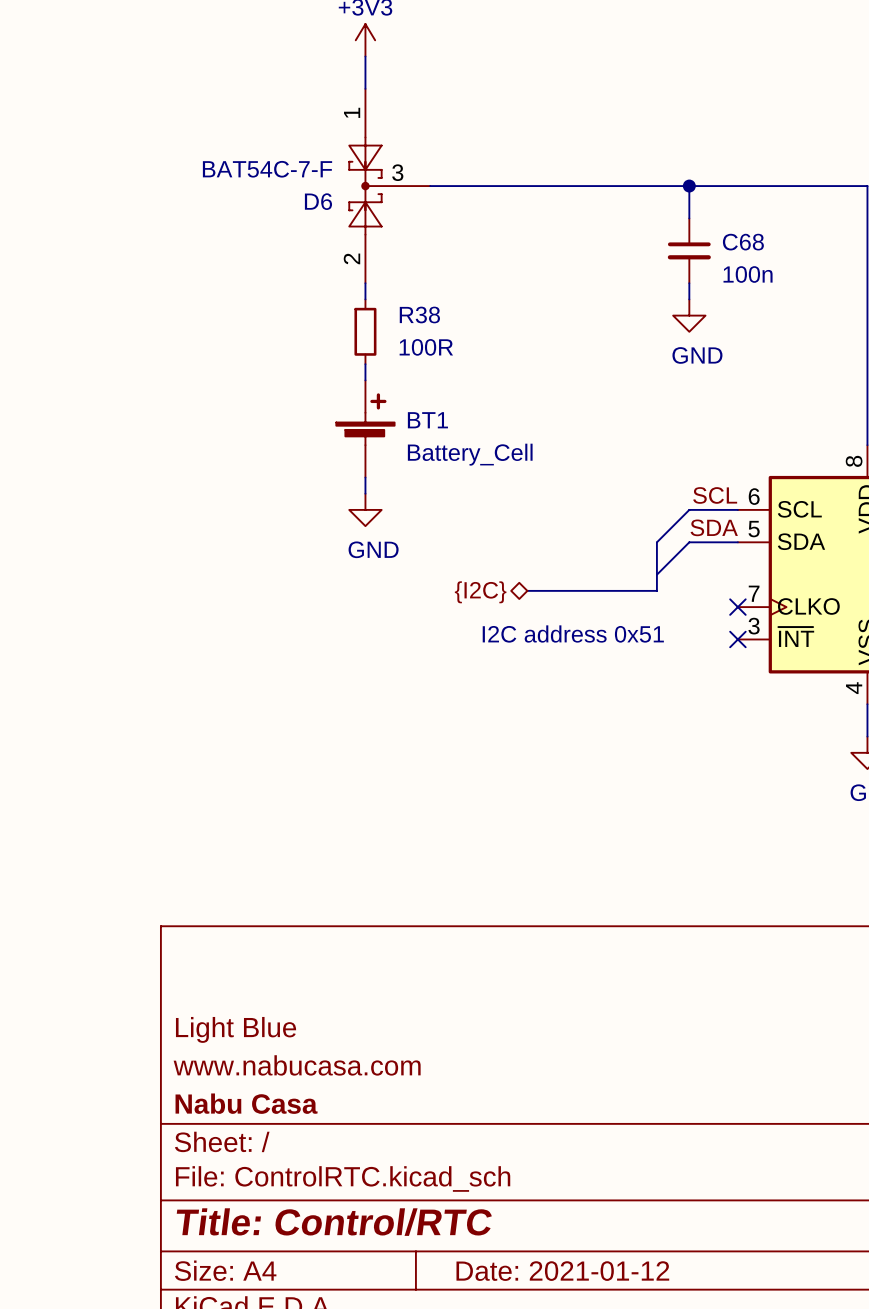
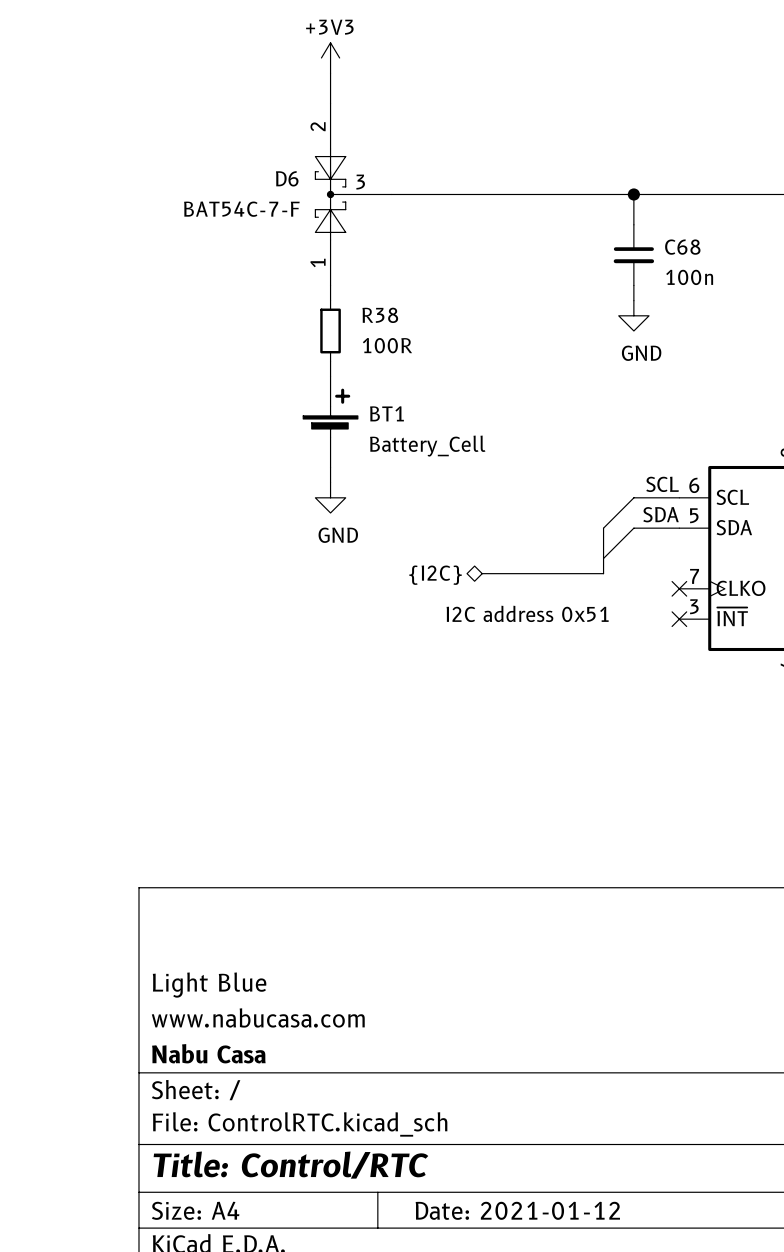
D6 flip: as is (365, 186) -> up-down (330, 194)

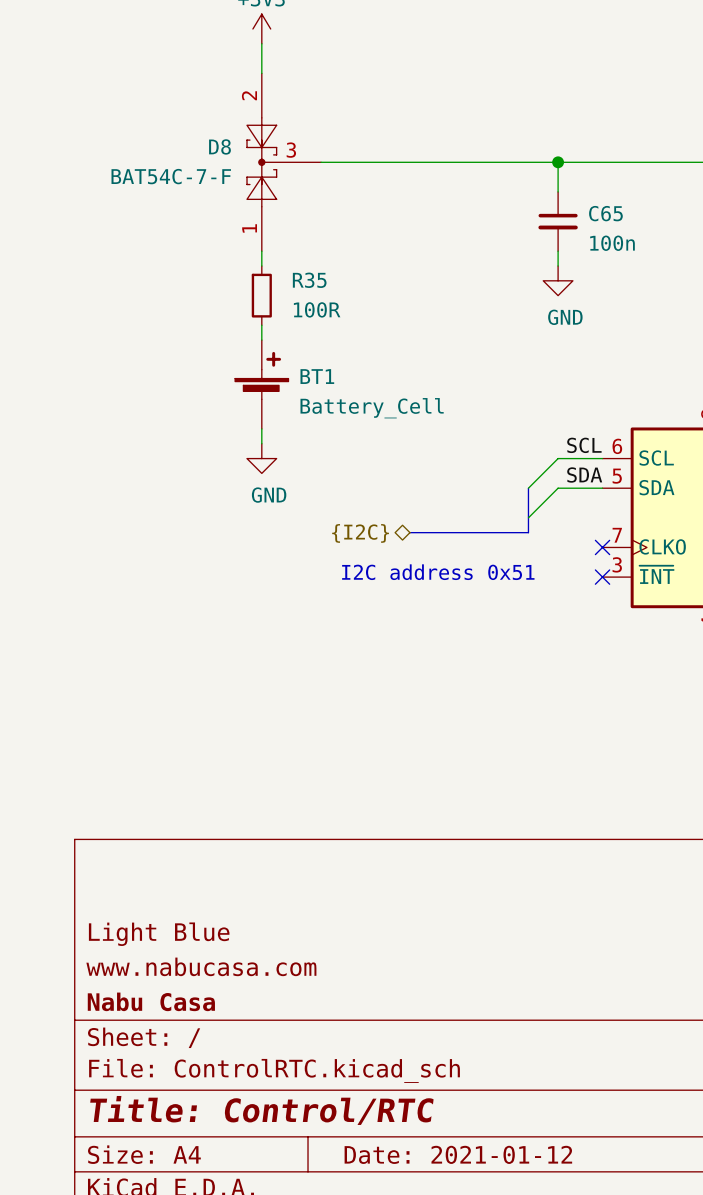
D6 name: D6 (287, 178) -> D8 (219, 146)
C68 name: C68 (682, 247) -> C65 (605, 213)
R38 name: R38 (380, 315) -> R35 (309, 280)

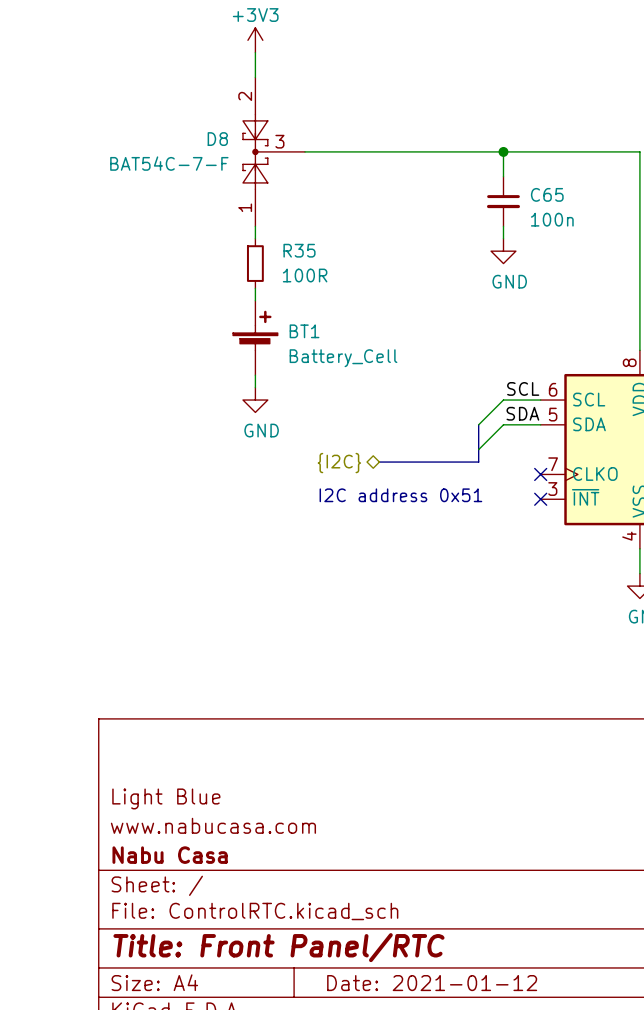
title block: Title: Control/RTC (261, 1110) -> Title: Front Panel/RTC (278, 947)

